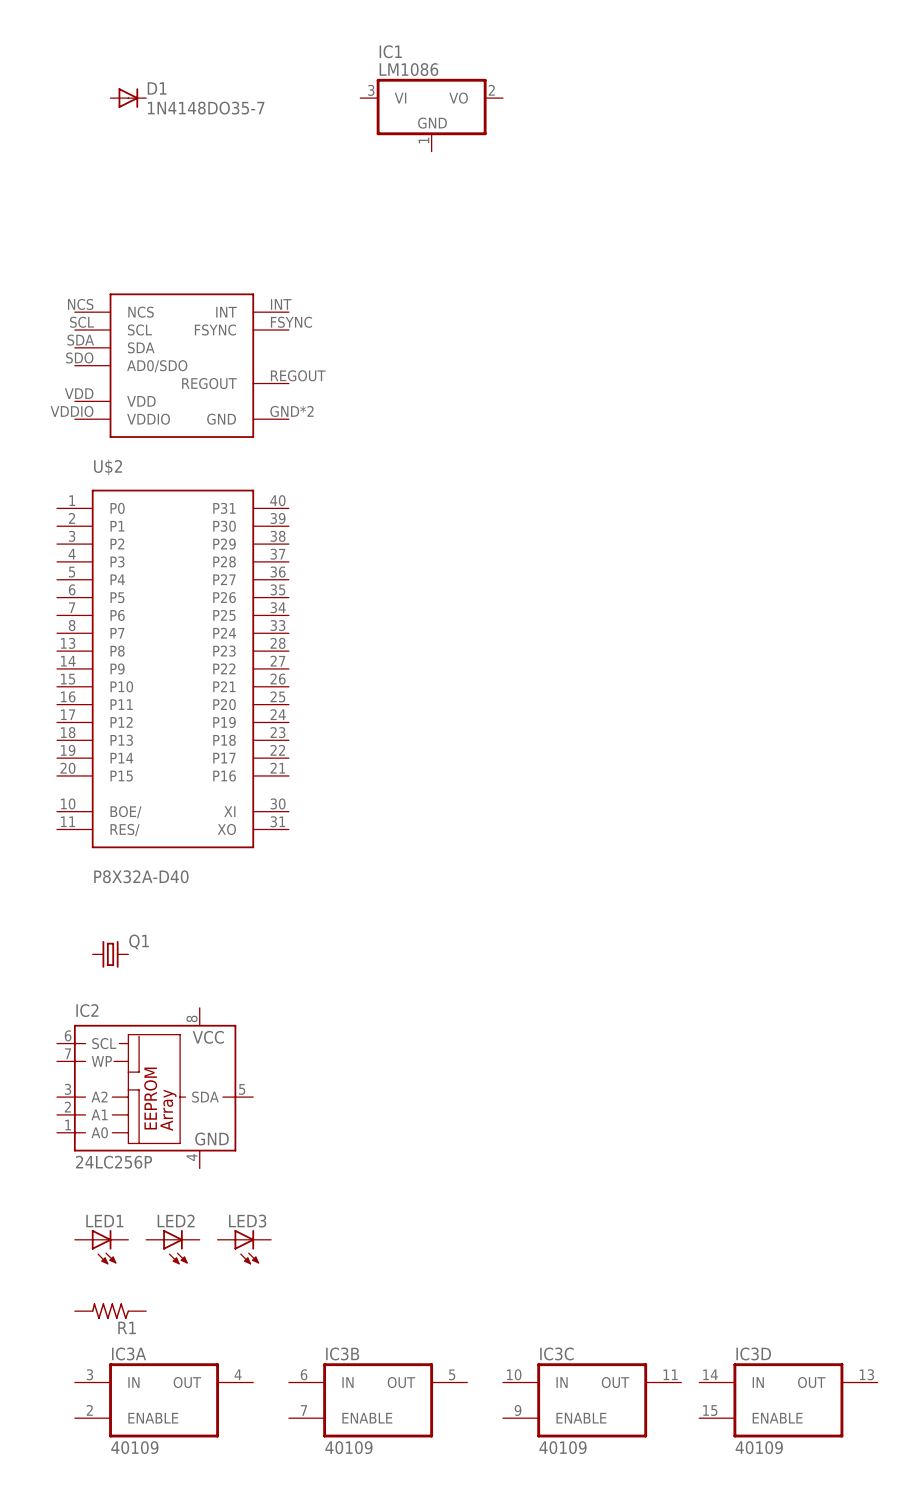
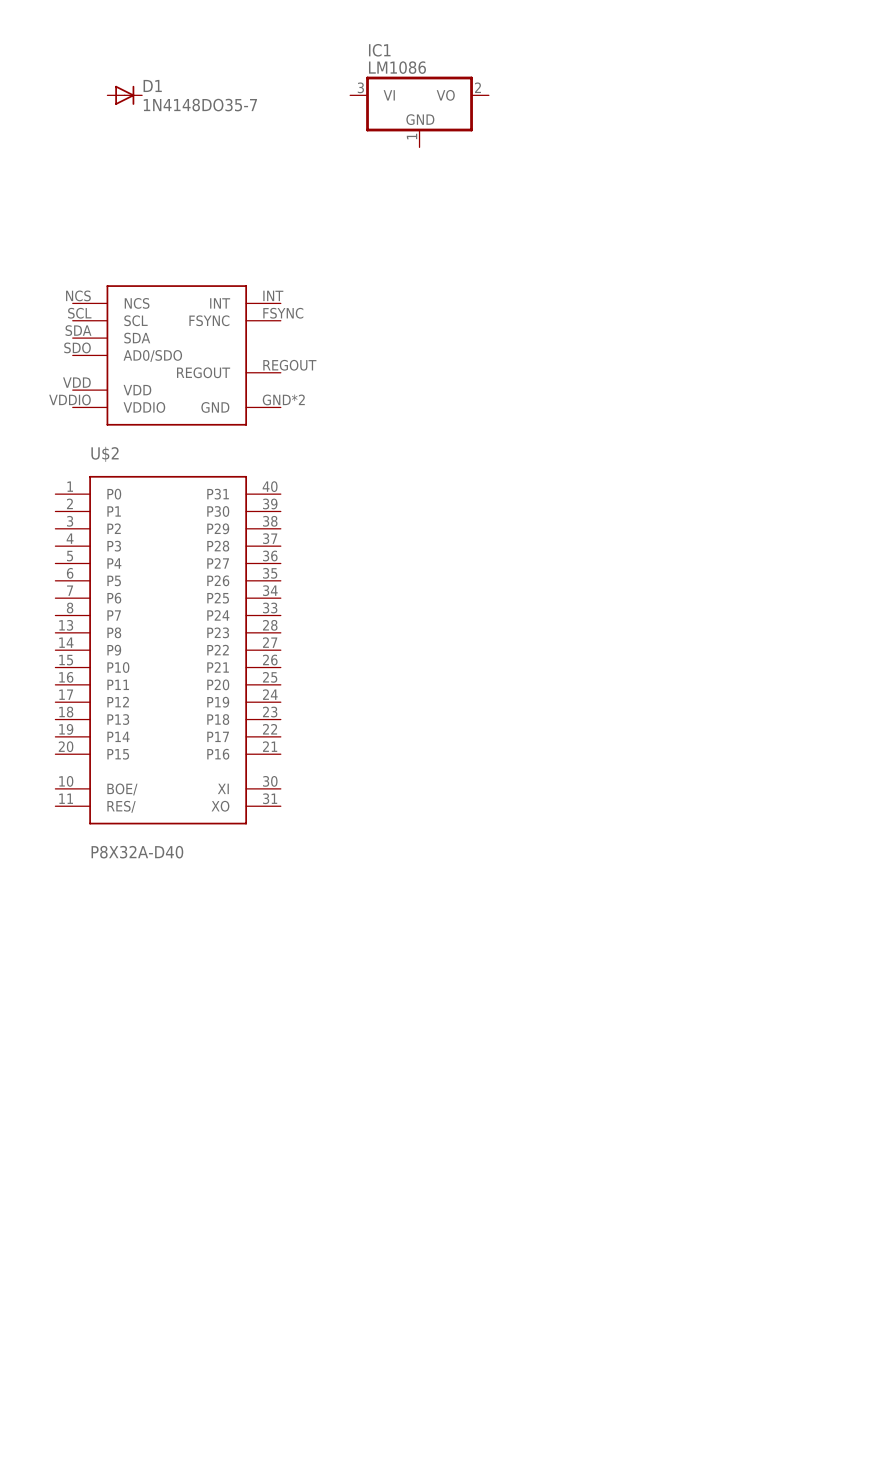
Q1: (110, 954) -> none
IC2: 24LC256P (155, 1088) -> none
LED1: (101, 1247) -> none
LED2: (172, 1247) -> none
LED3: (244, 1247) -> none
R1: (110, 1311) -> none
IC3A: 40109 (164, 1400) -> none
IC3B: 40109 (378, 1400) -> none
IC3C: 40109 (592, 1400) -> none
IC3D: 40109 (788, 1400) -> none

